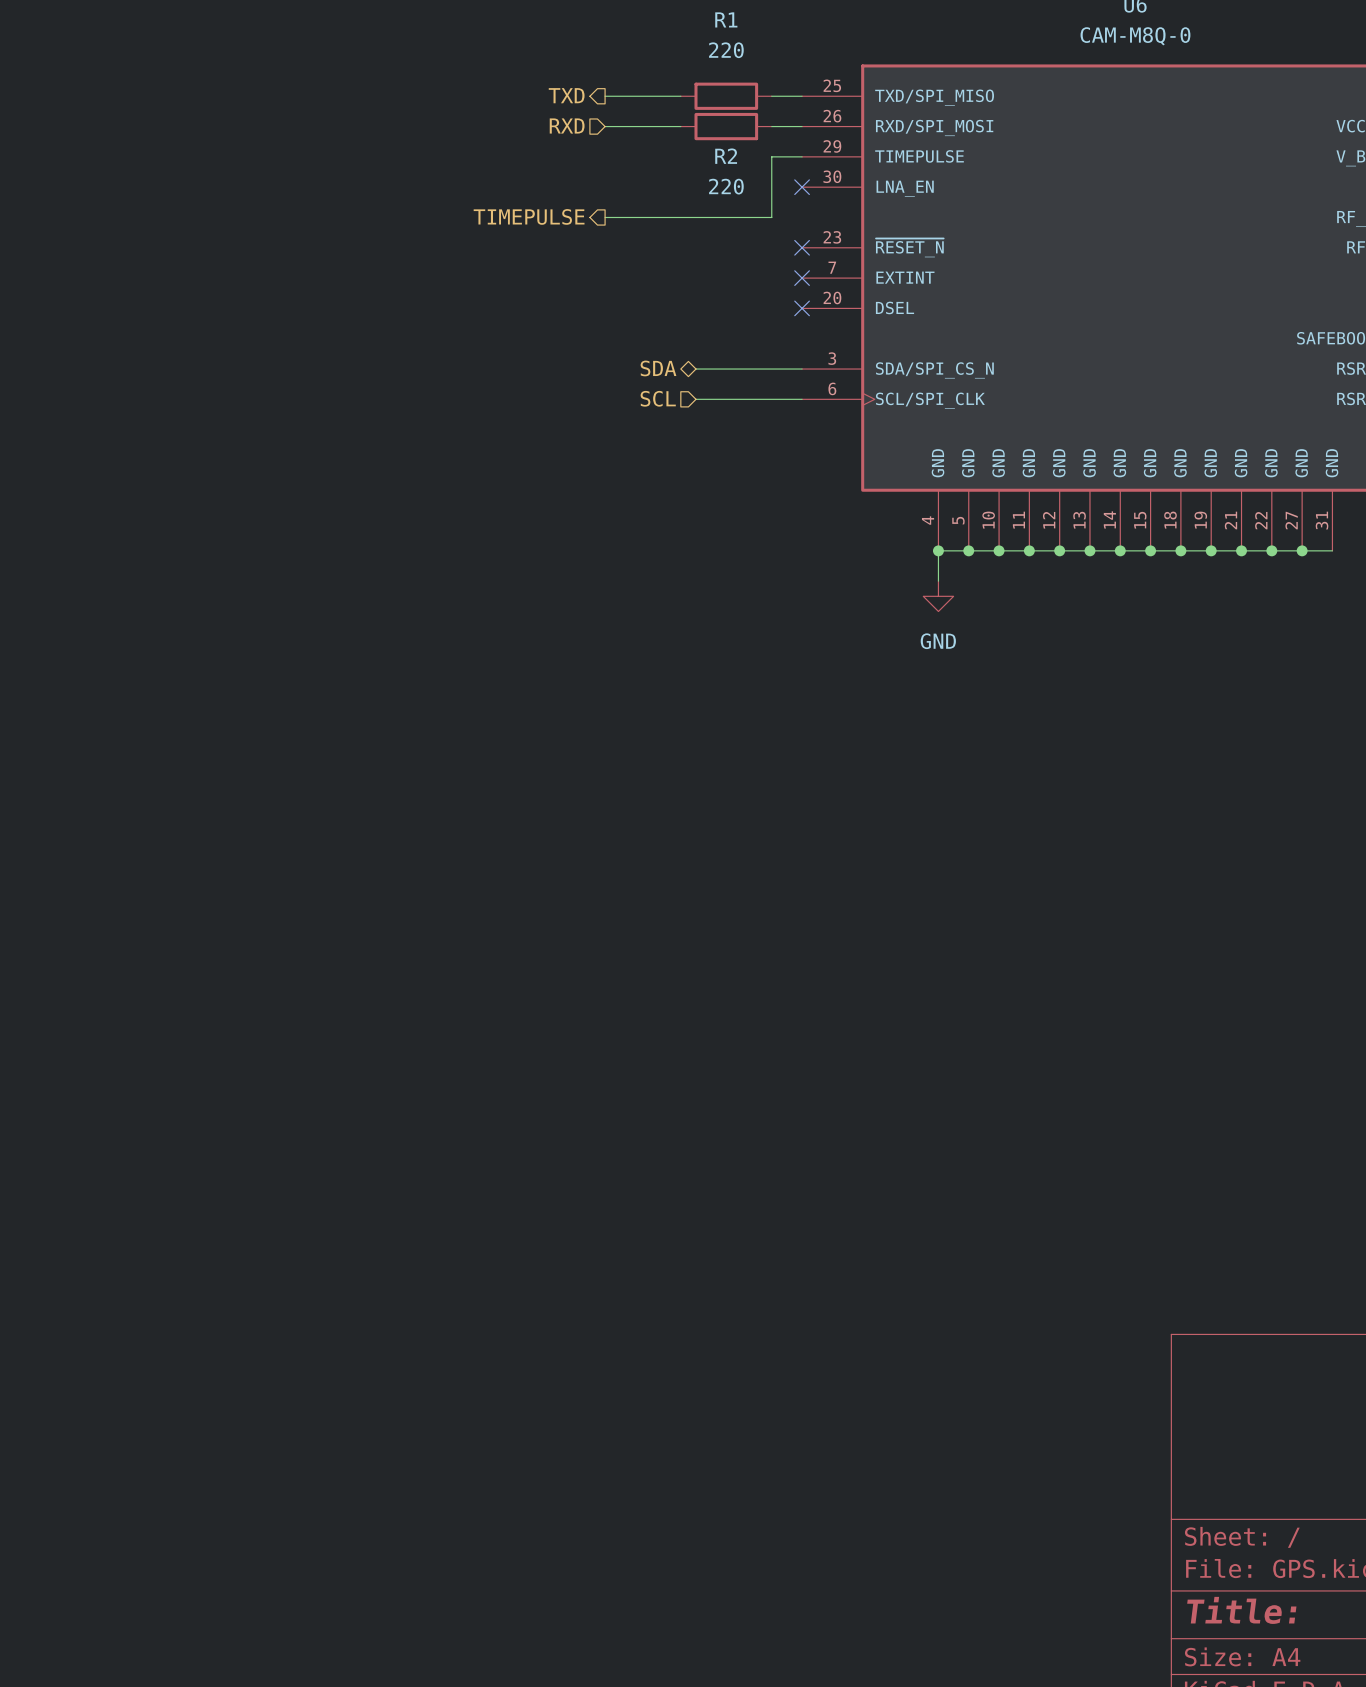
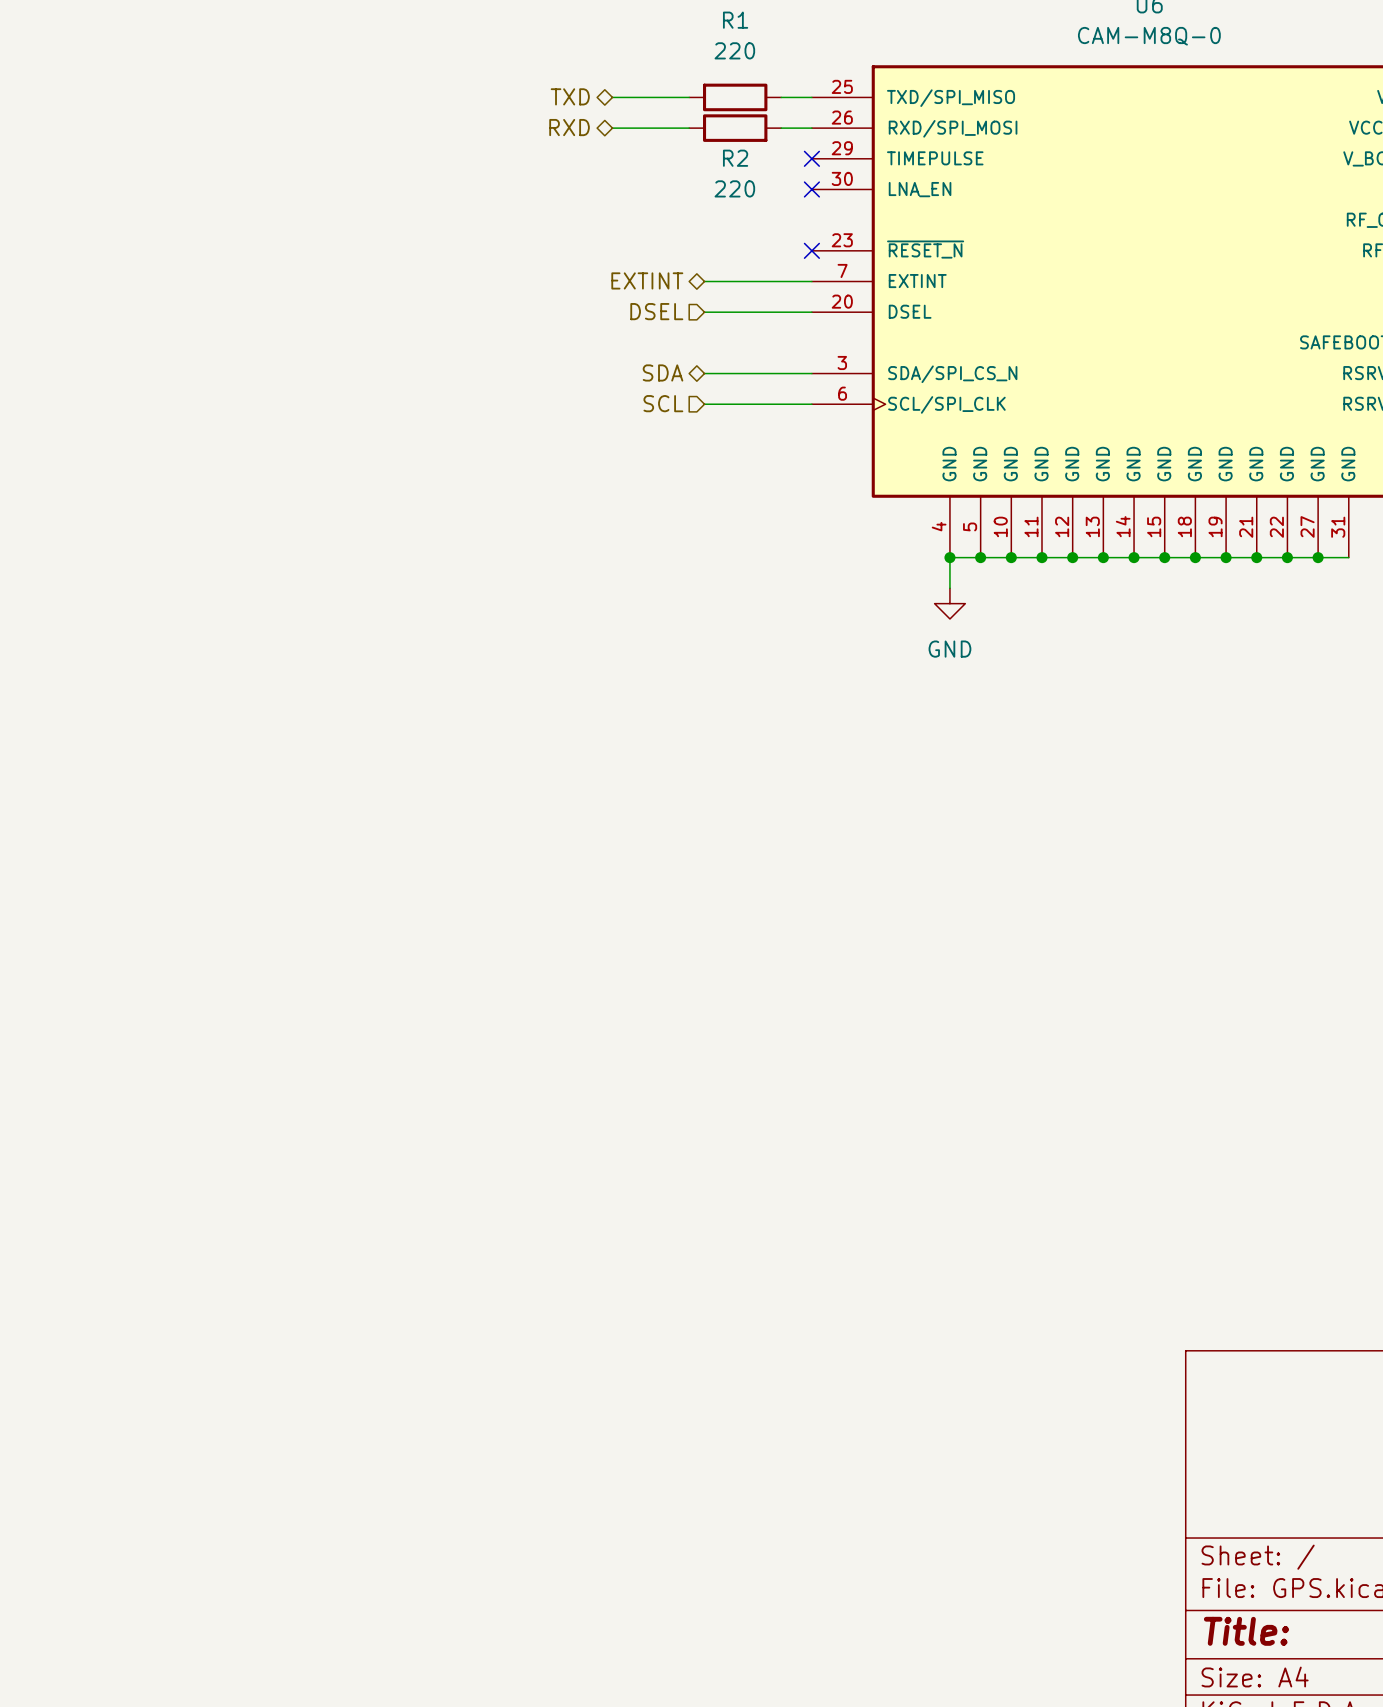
hierarchical label shape: output (566, 95) -> bidirectional (570, 96)
hierarchical label shape: input (567, 126) -> bidirectional (569, 127)
wire: (802, 156) (771, 156) (771, 217) (605, 217) -> none
no-connect mark: none -> (811, 158)
hierarchical label: TIMEPULSE (529, 216) -> none
hierarchical label: none -> EXTINT (647, 280)
wire: none -> (704, 281) (811, 281)
no-connect mark: (802, 278) -> none
hierarchical label: none -> DSEL (656, 311)
wire: none -> (704, 312) (811, 312)
no-connect mark: (802, 308) -> none

